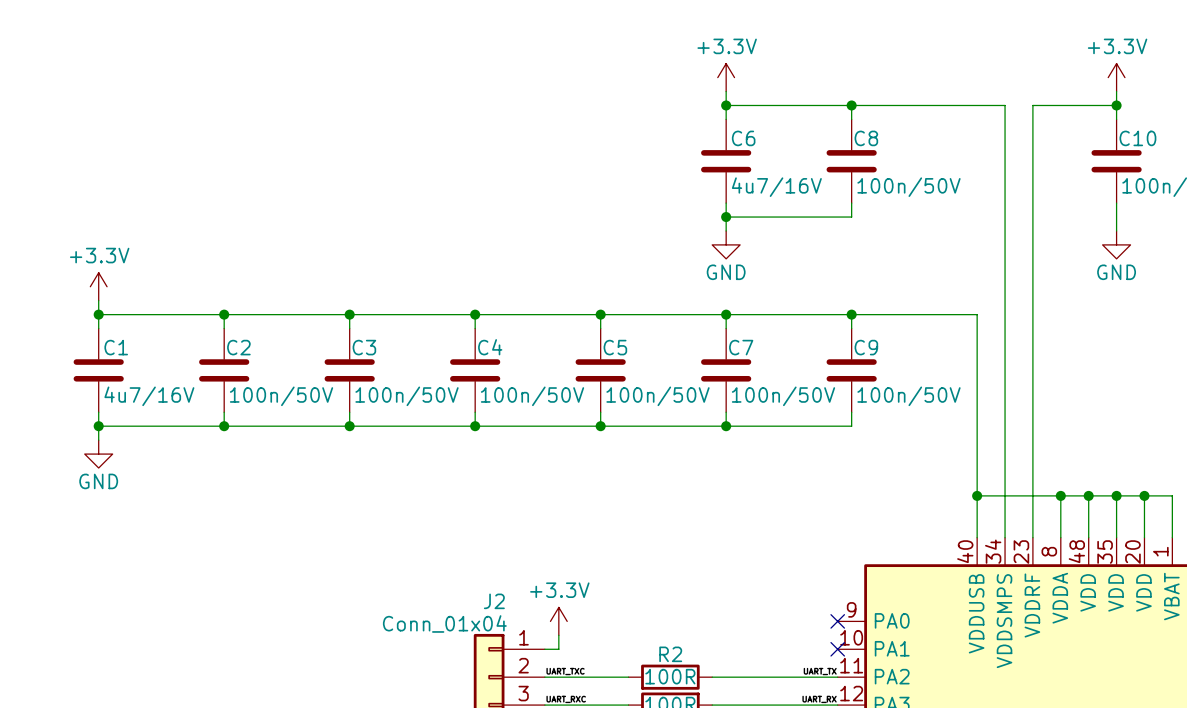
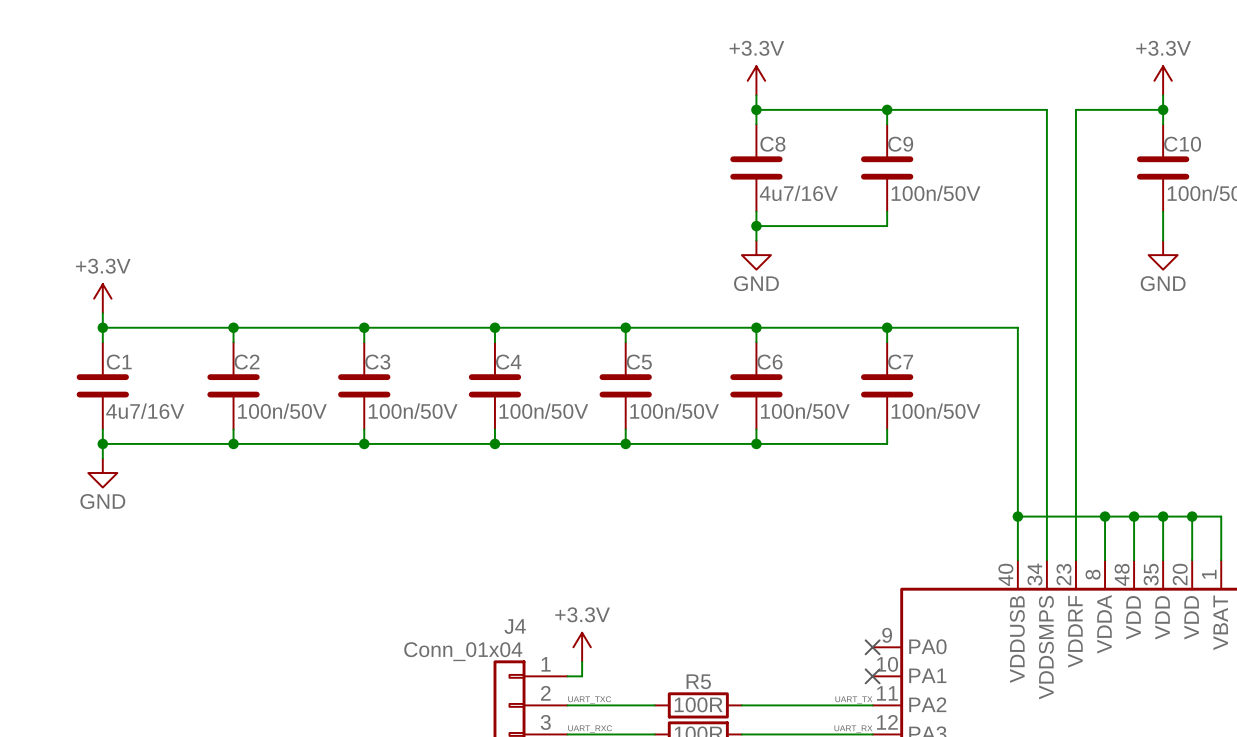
C6 name: C6 (743, 138) -> C8 (772, 144)
C8 name: C8 (866, 138) -> C9 (900, 144)
C7 name: C7 (741, 347) -> C6 (769, 362)
C9 name: C9 (866, 347) -> C7 (900, 362)
J2 name: J2 (494, 601) -> J4 (515, 626)
R2 name: R2 (670, 654) -> R5 (698, 681)

